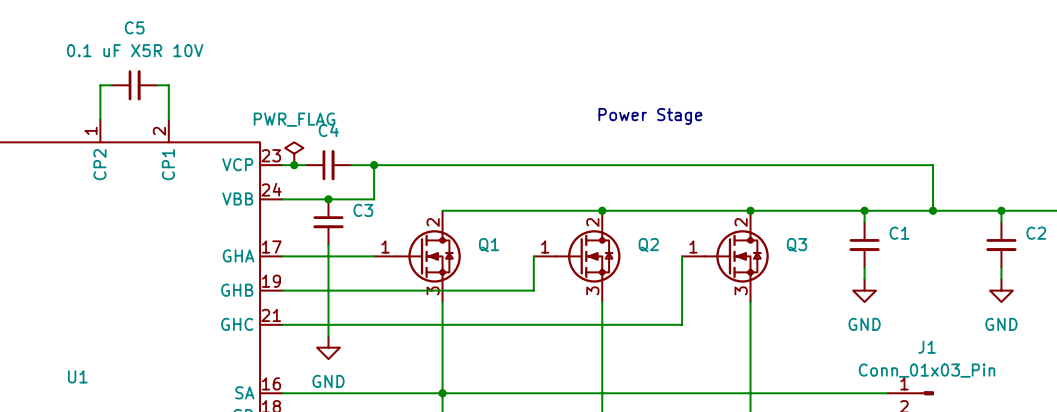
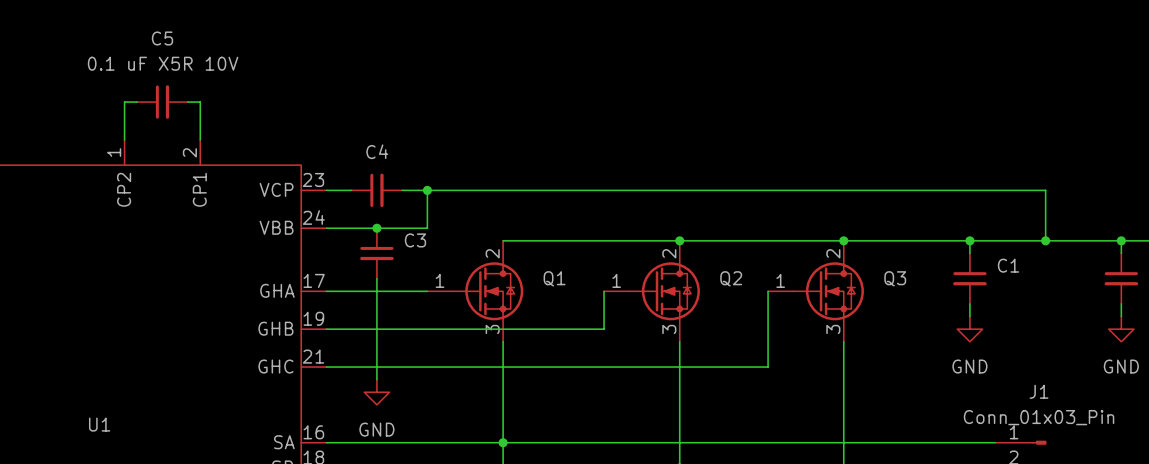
text: Power Stage (650, 116) -> none
power symbol: PWR_FLAG (294, 153) -> none
junction: (294, 165) -> none

